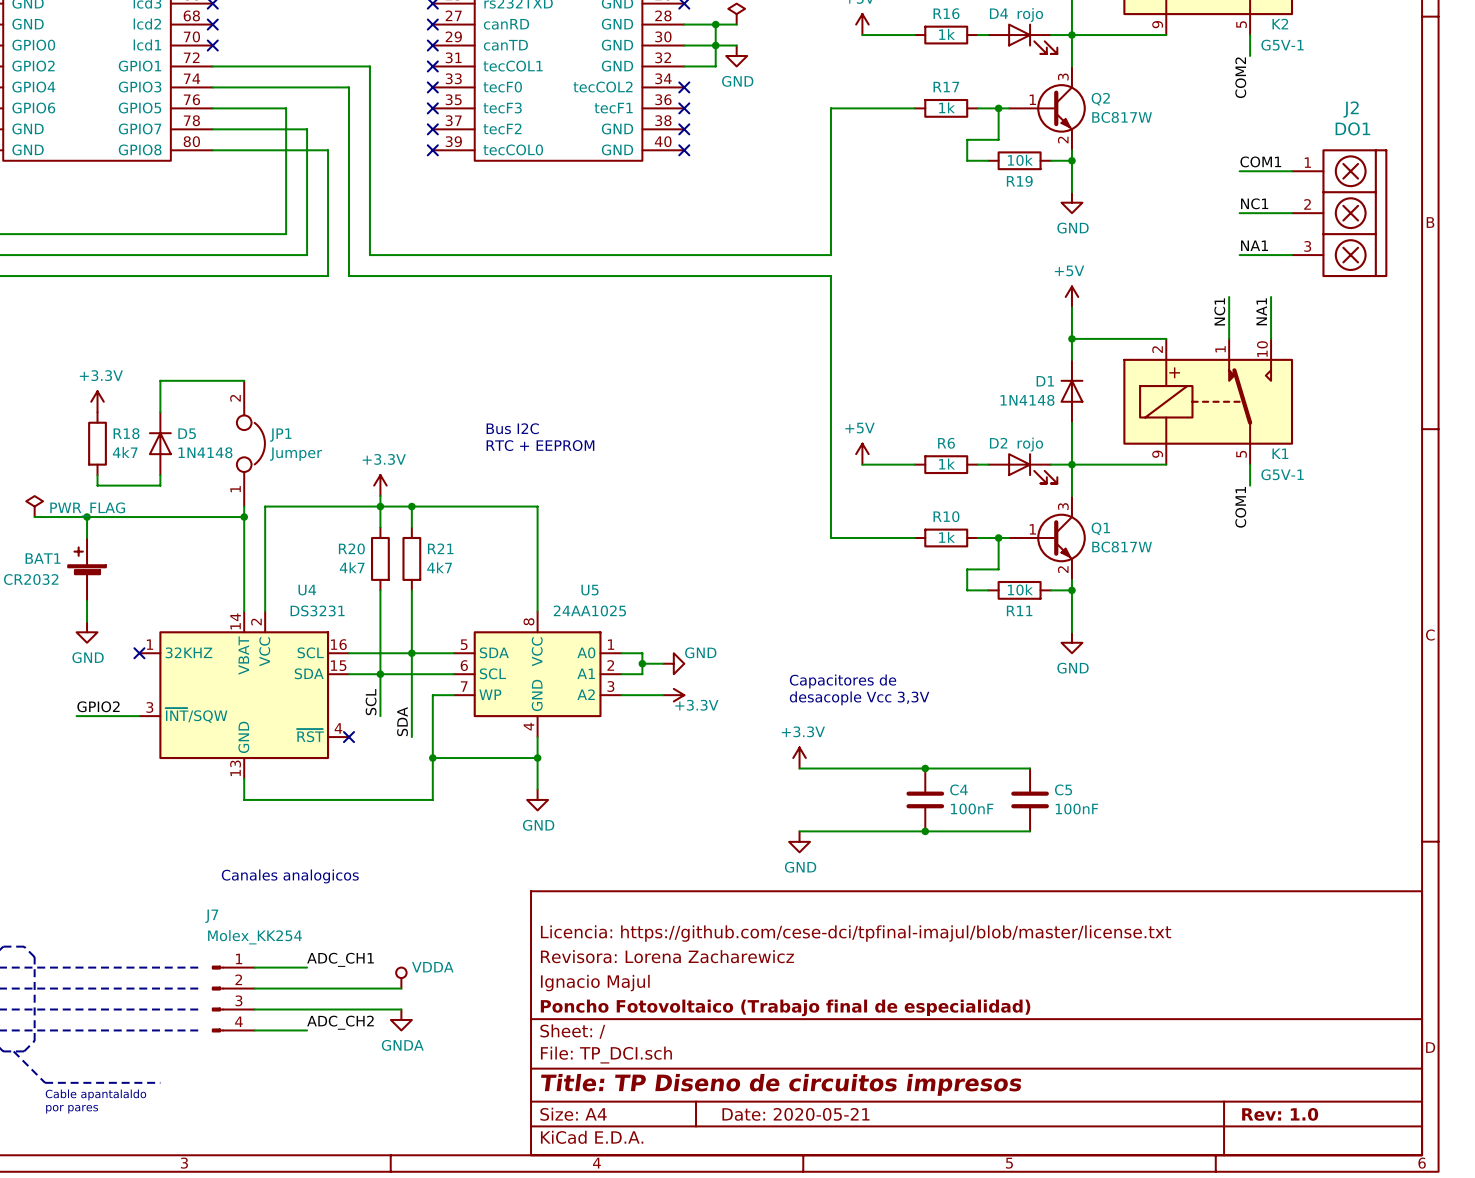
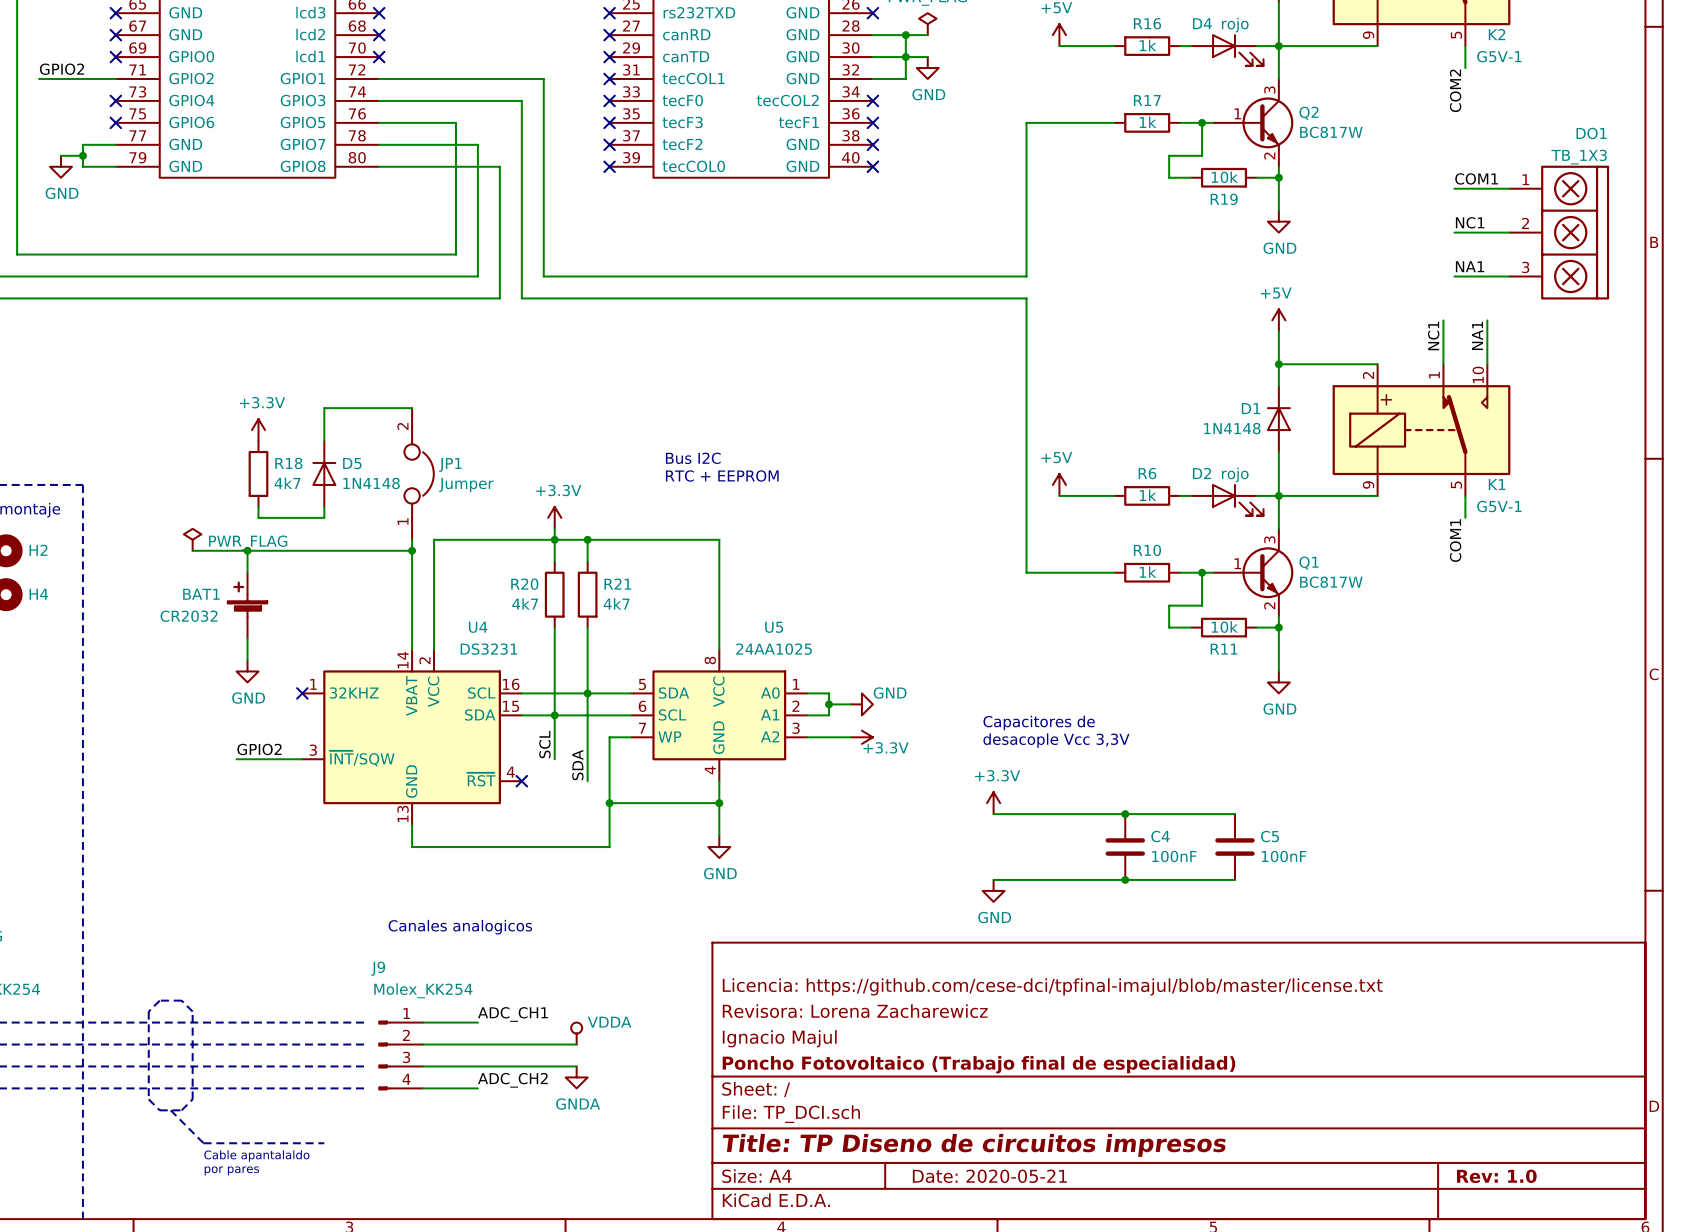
J2 name: J2 (1351, 109) -> DO1 (1591, 133)
J2 value: DO1 (1352, 128) -> TB_1X3 (1579, 157)
J7 name: J7 (211, 916) -> J9 (378, 968)

